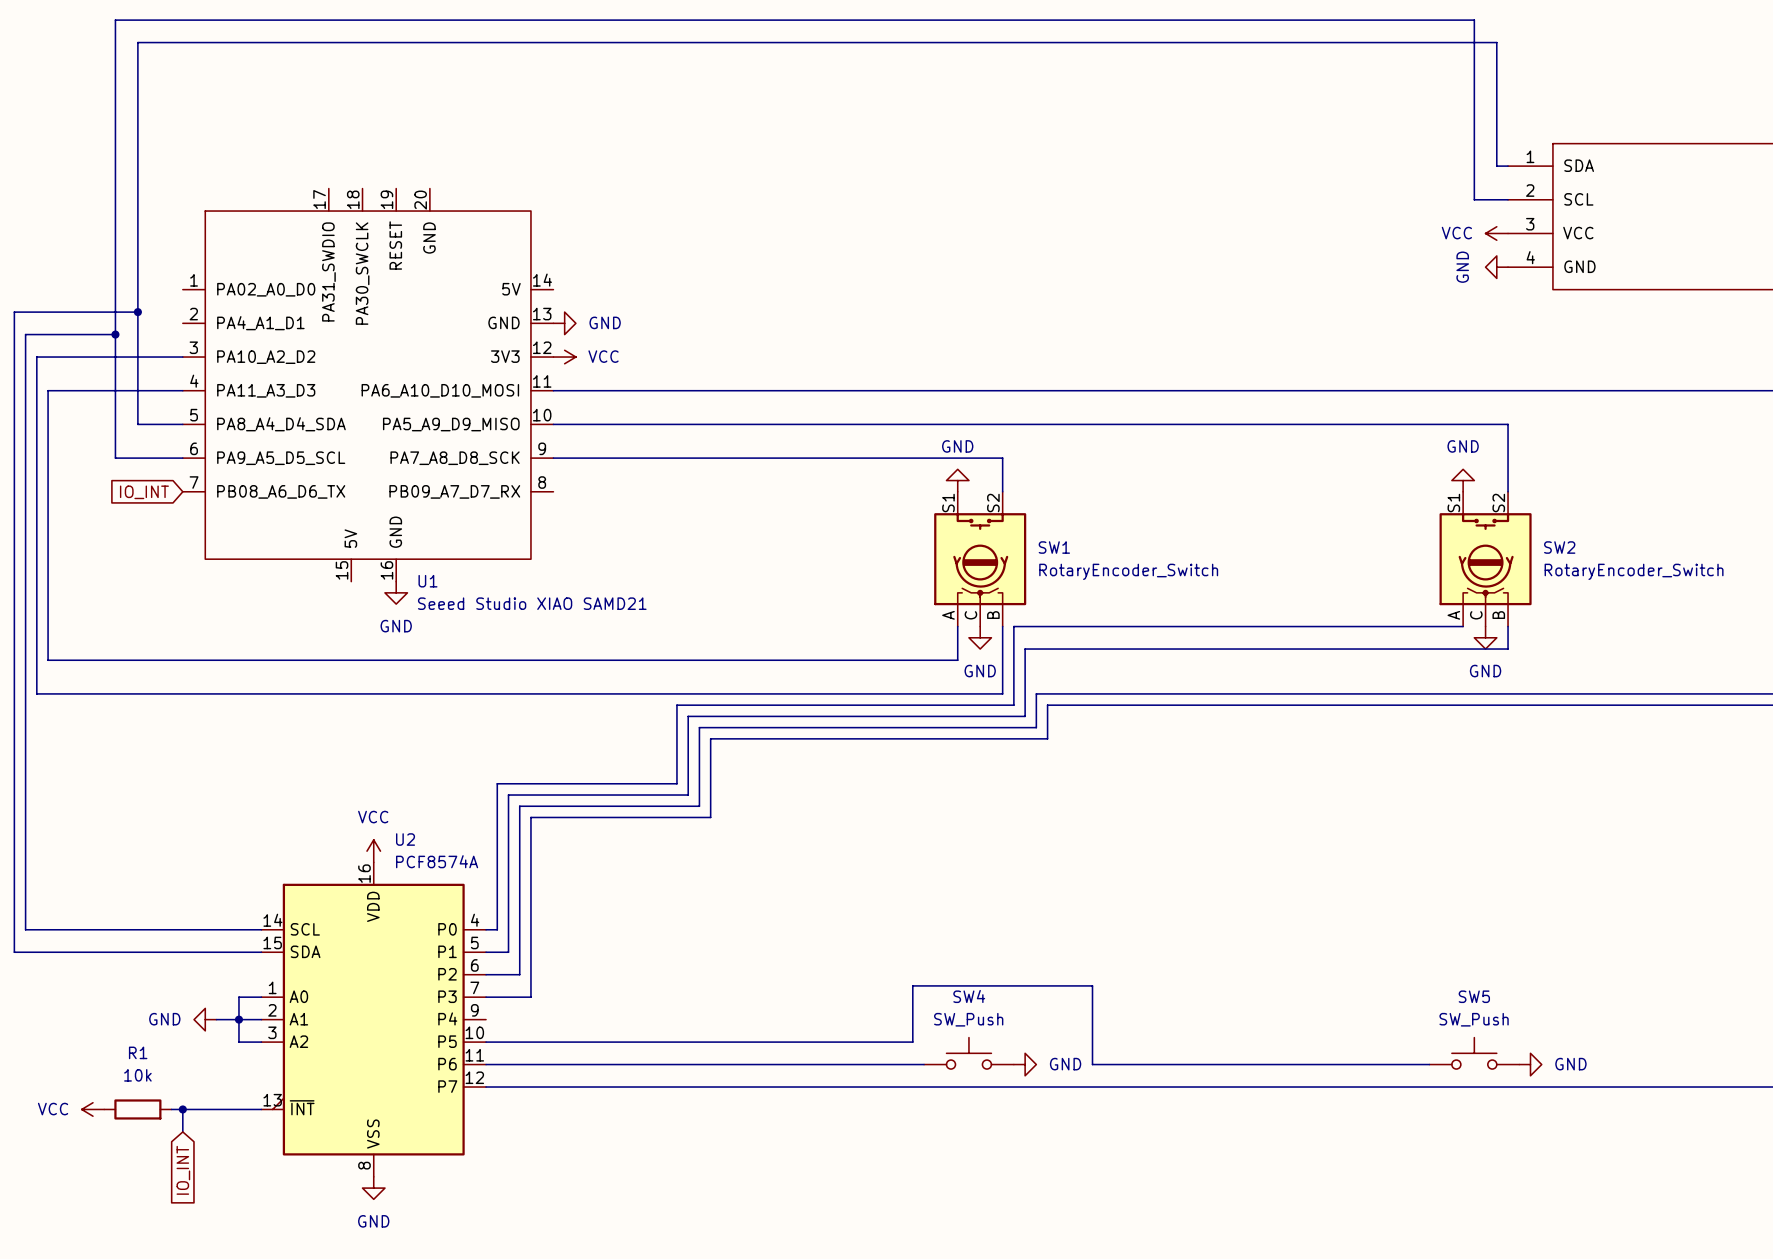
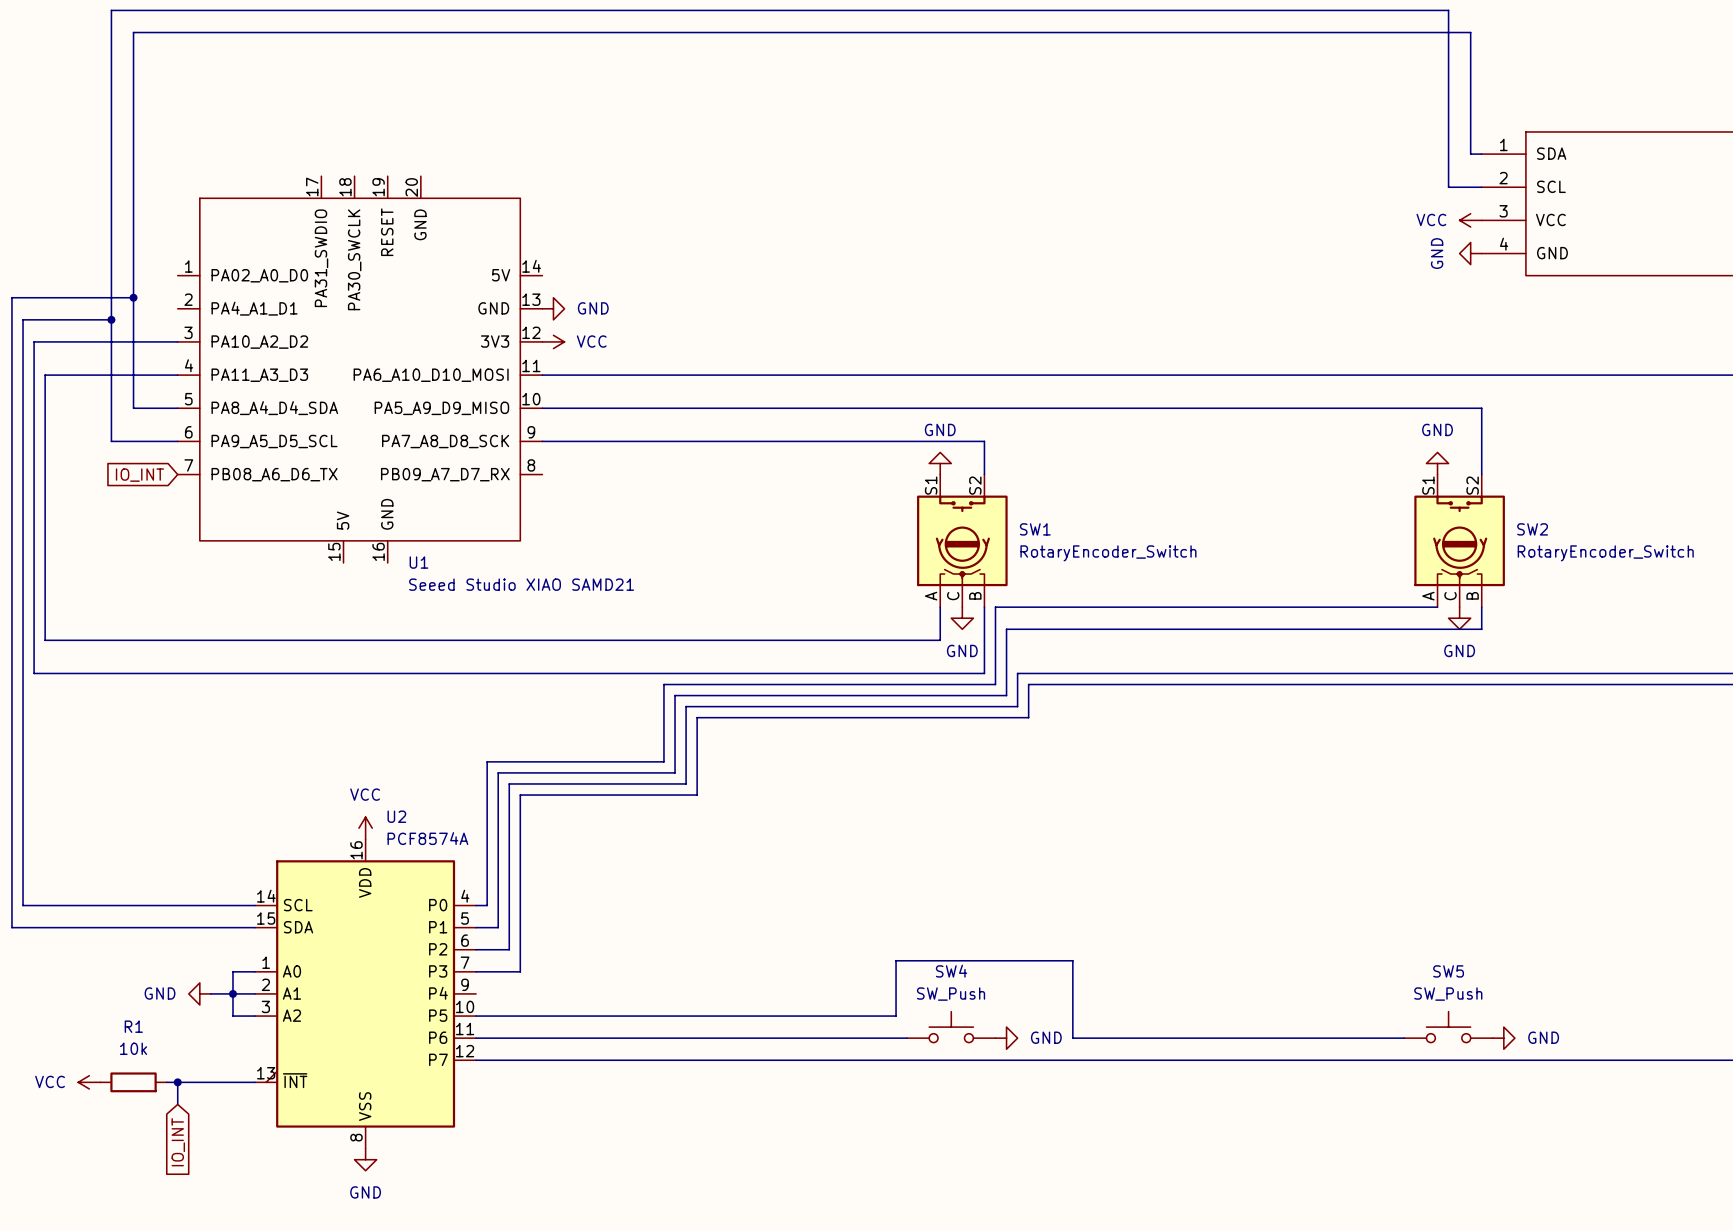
power symbol: GND (396, 592) -> none

